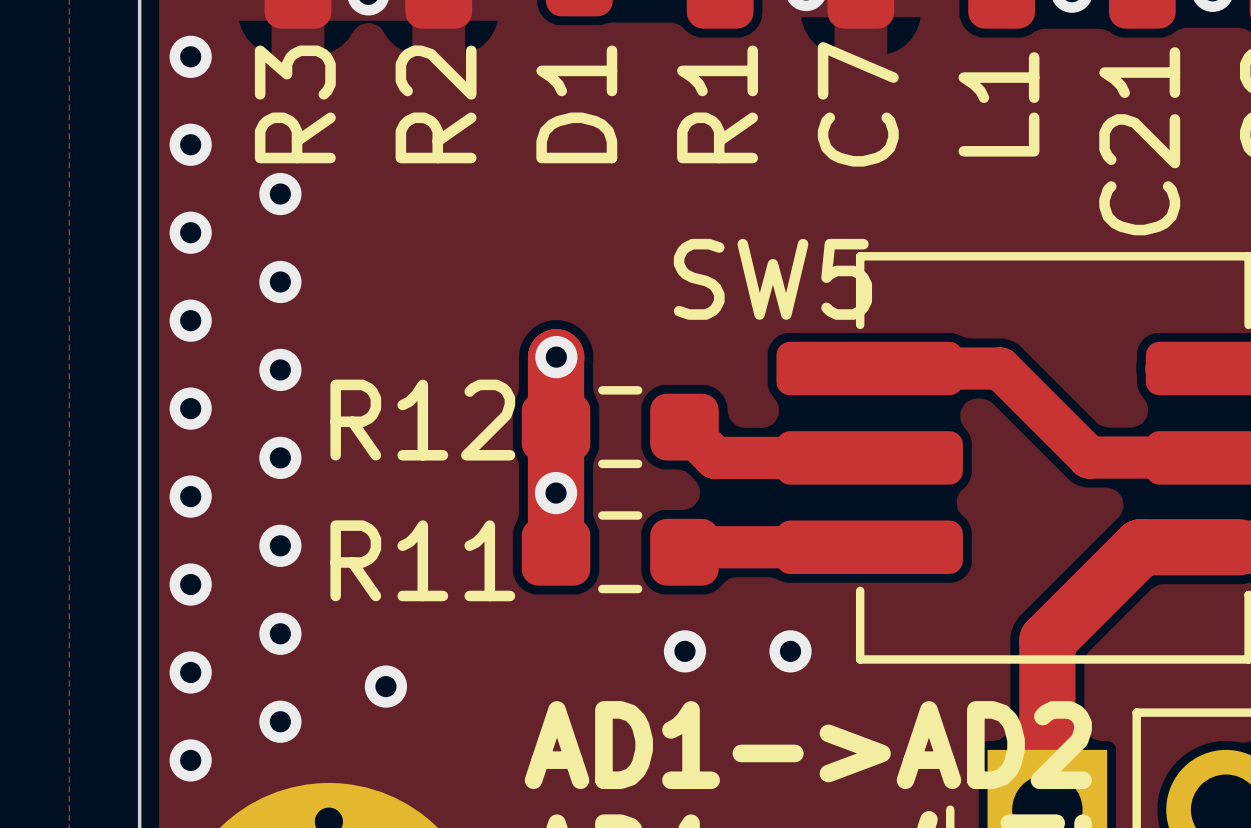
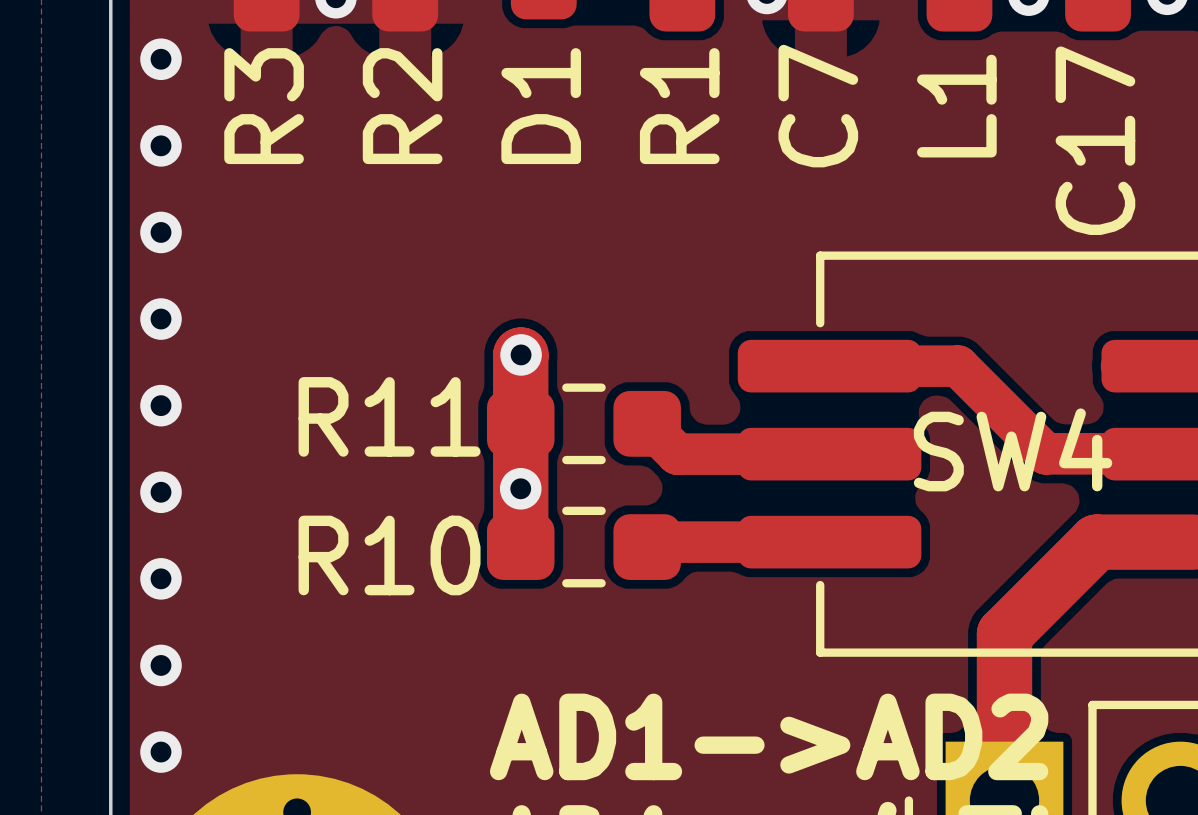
C21 name: C21 (1139, 141) -> C17 (1095, 140)
via: (280, 194) -> none
SW5 name: SW5 (772, 279) -> SW4 (1013, 449)
via: (280, 281) -> none
via: (280, 369) -> none
R12 name: R12 (422, 420) -> R11 (389, 416)
via: (280, 457) -> none
via: (280, 545) -> none
R11 name: R11 (422, 560) -> R10 (389, 555)
via: (280, 633) -> none
via: (684, 651) -> none
via: (790, 651) -> none
via: (385, 686) -> none
via: (280, 721) -> none

